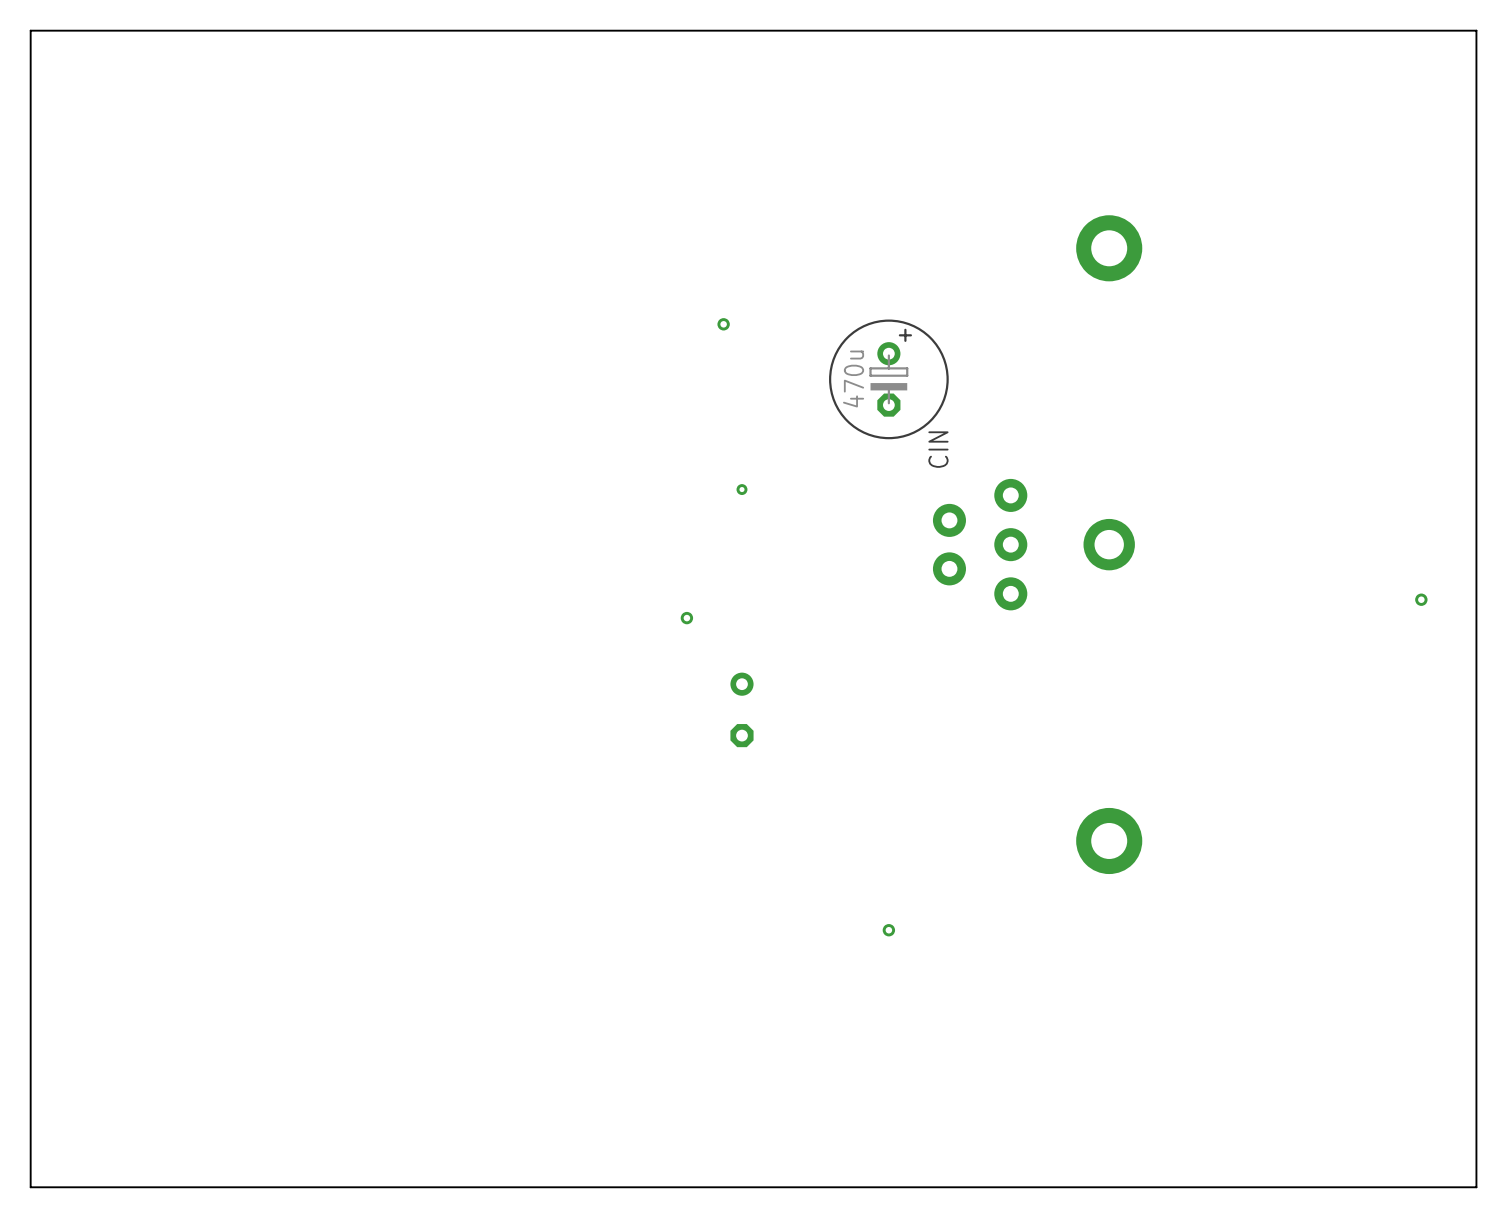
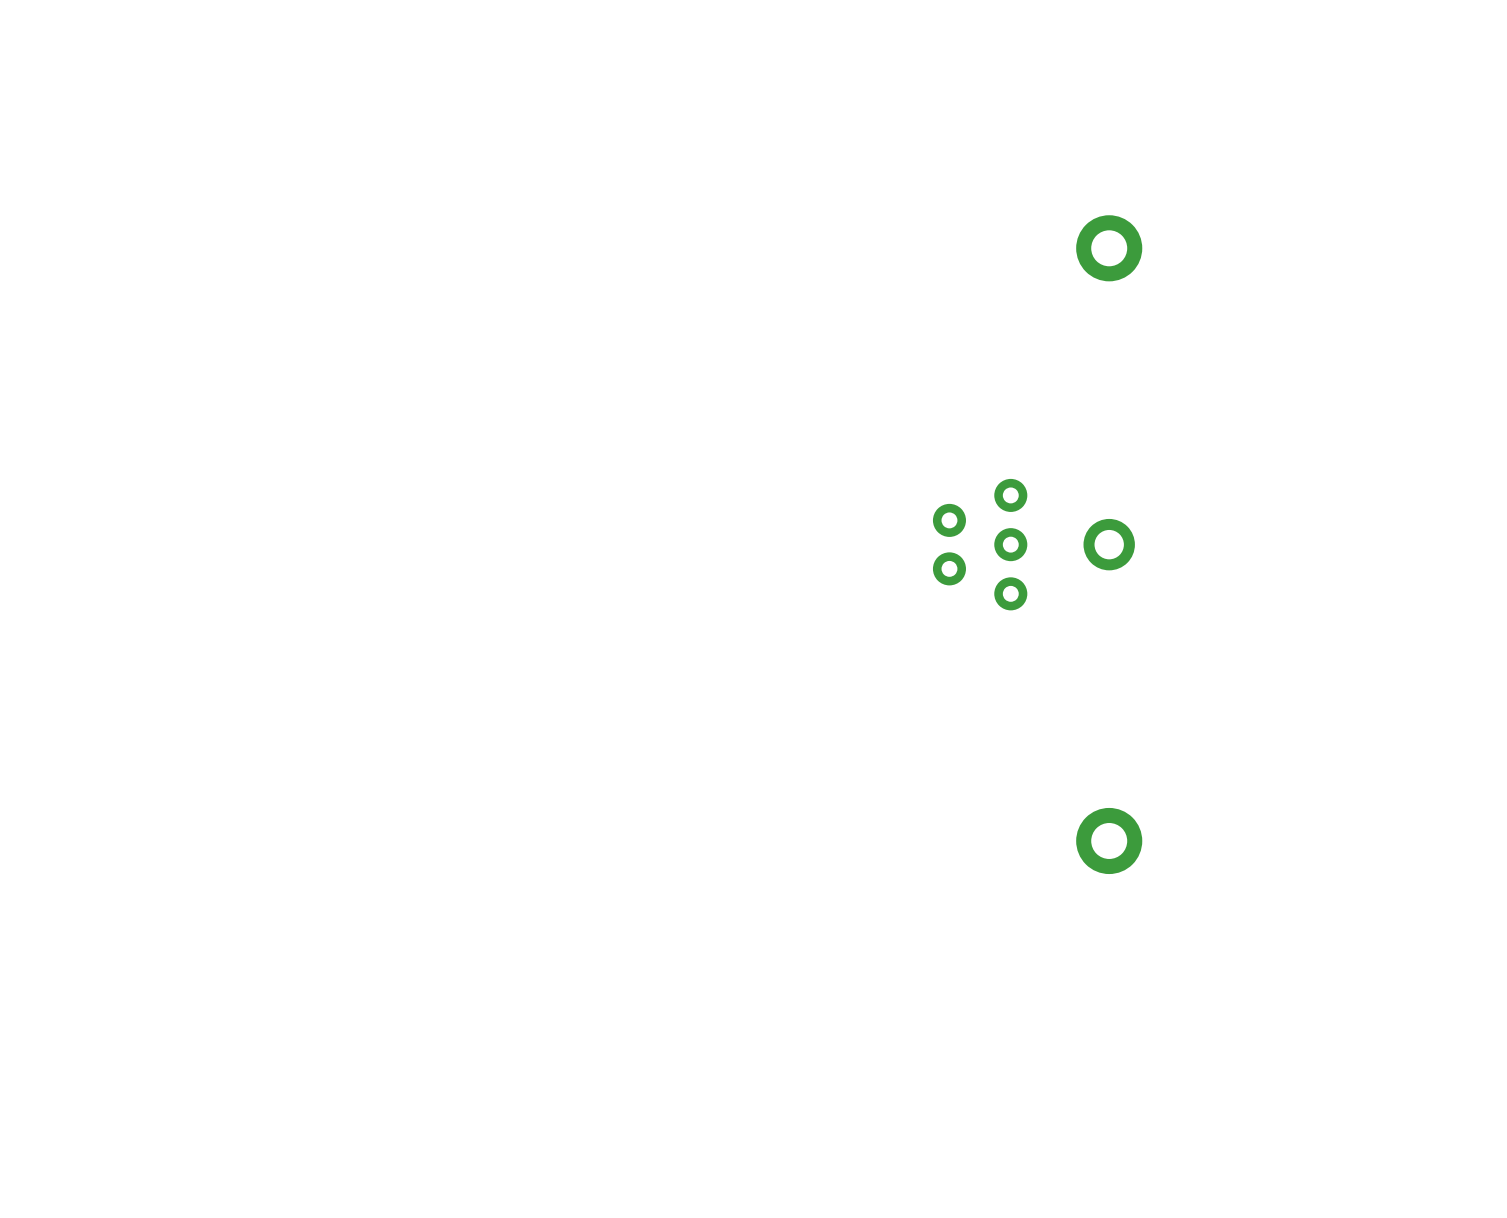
board edge: (1476, 30) (30, 30) (30, 1187) (1476, 1187) (1476, 30) -> none
via: (723, 324) -> none
CIN: 470u (888, 379) -> none
via: (741, 489) -> none
via: (1421, 599) -> none
via: (686, 618) -> none
part: (741, 709) -> none
via: (888, 930) -> none

